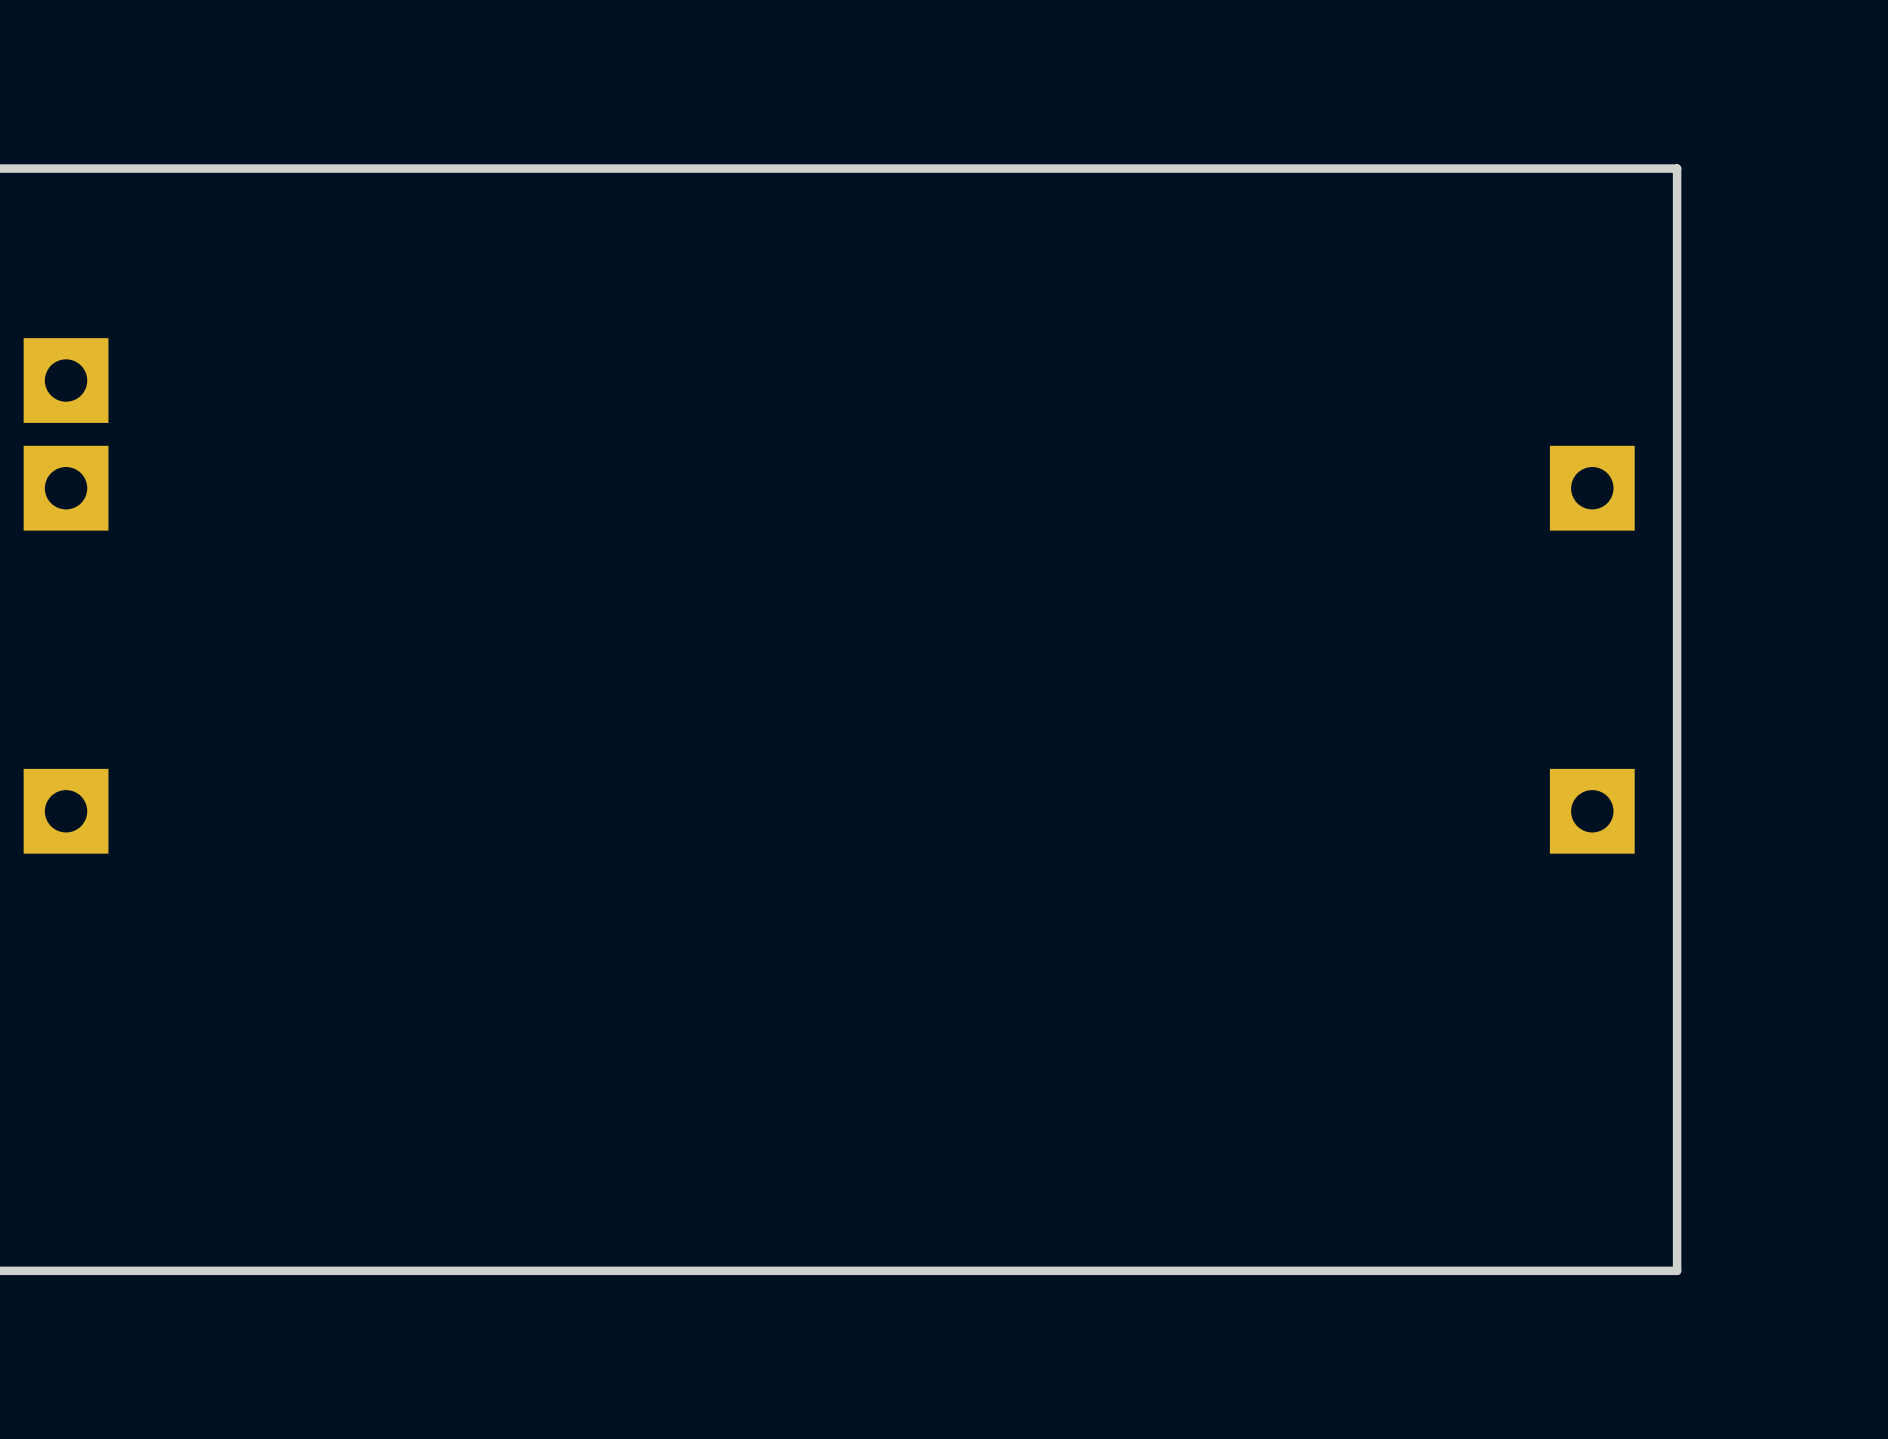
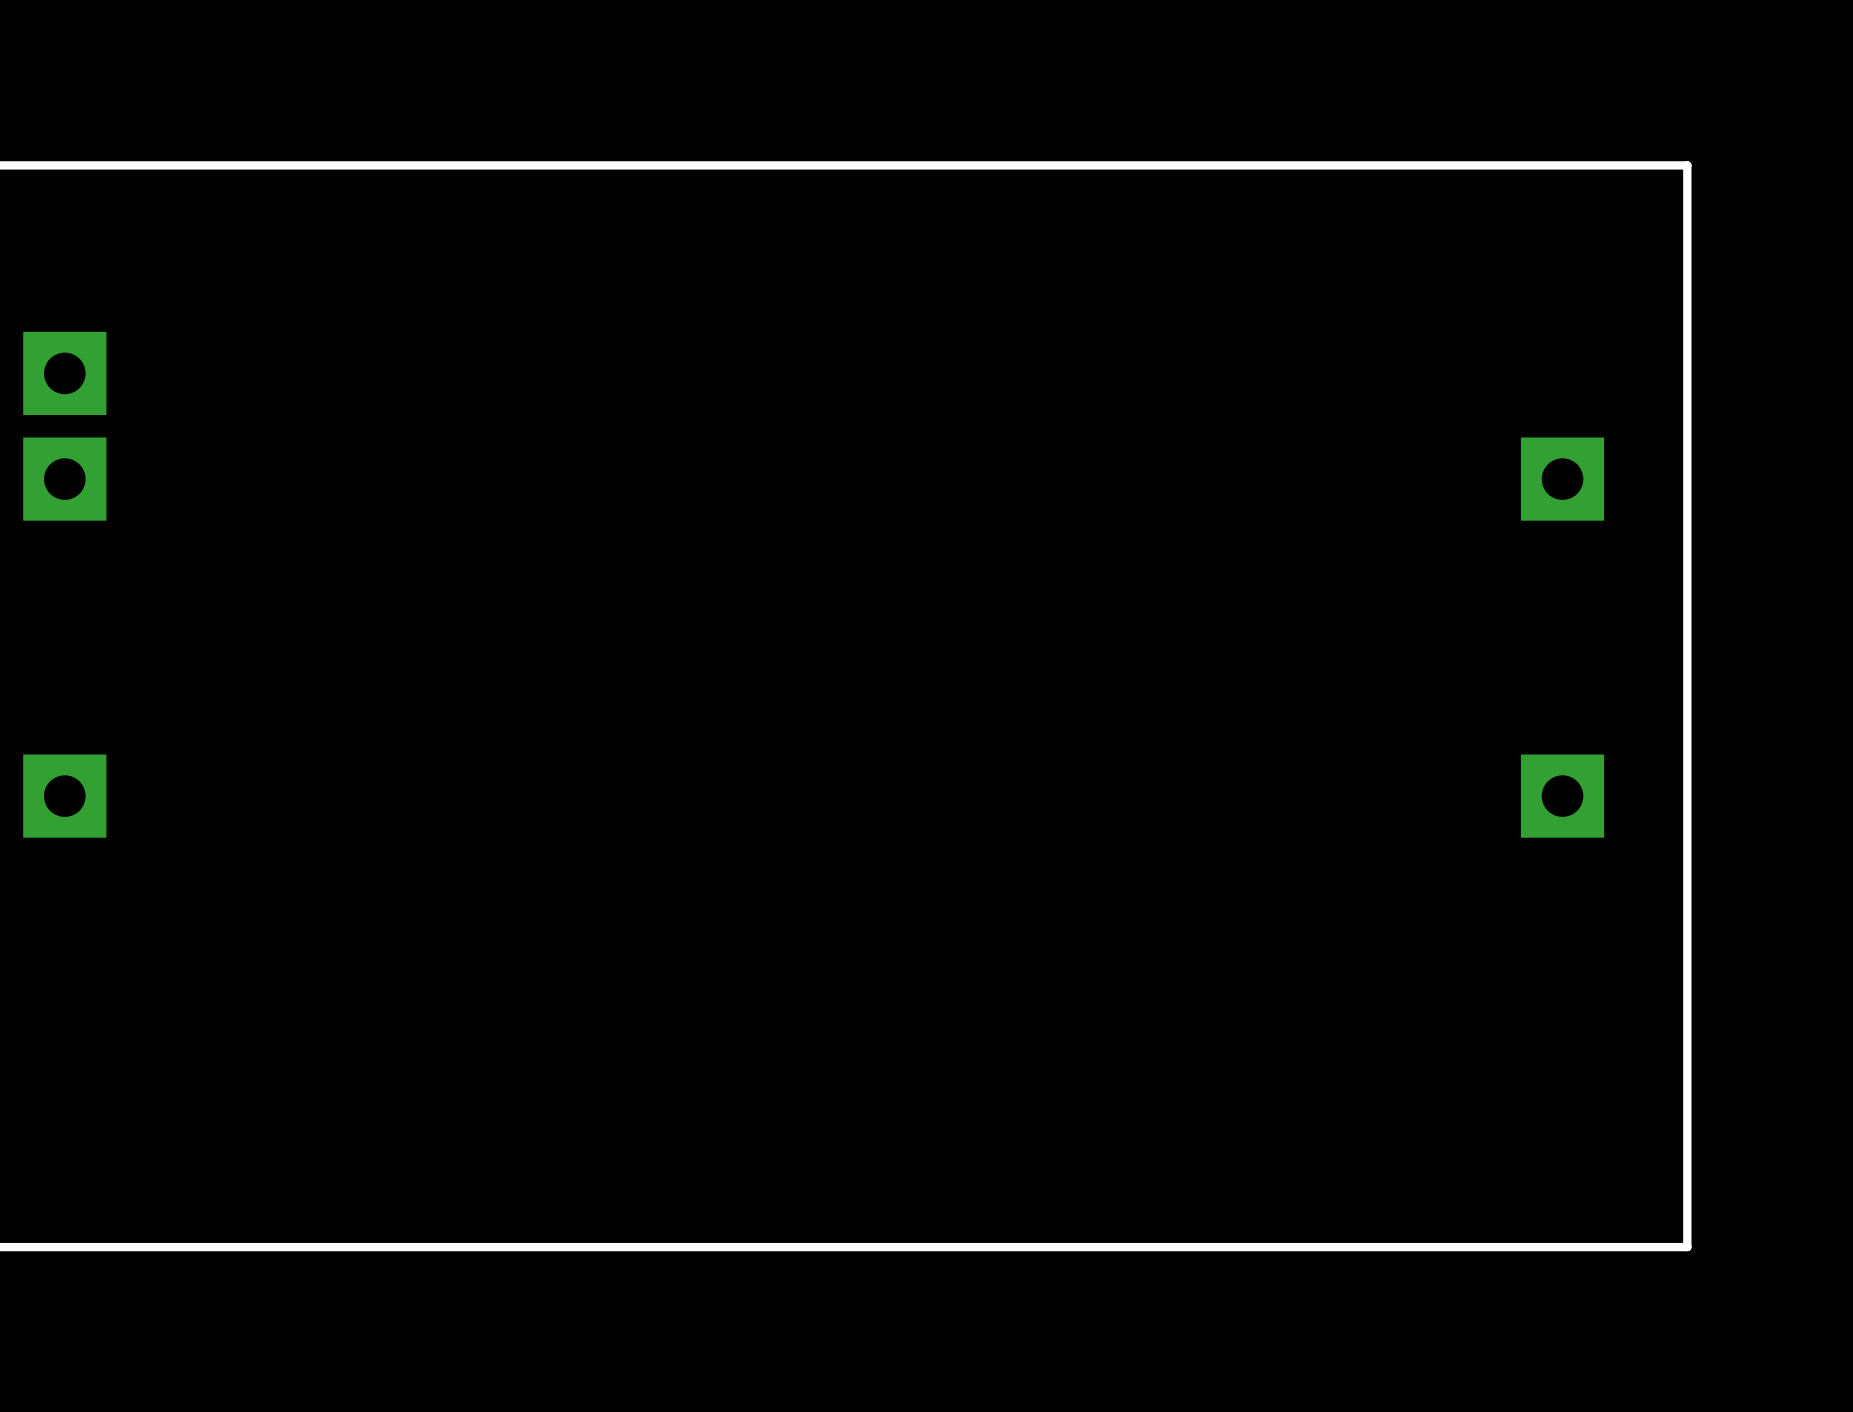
board edge: (1677, 168) (1677, 1270) -> (1645, 165) (1687, 165) (1687, 1247) (1645, 1247)

